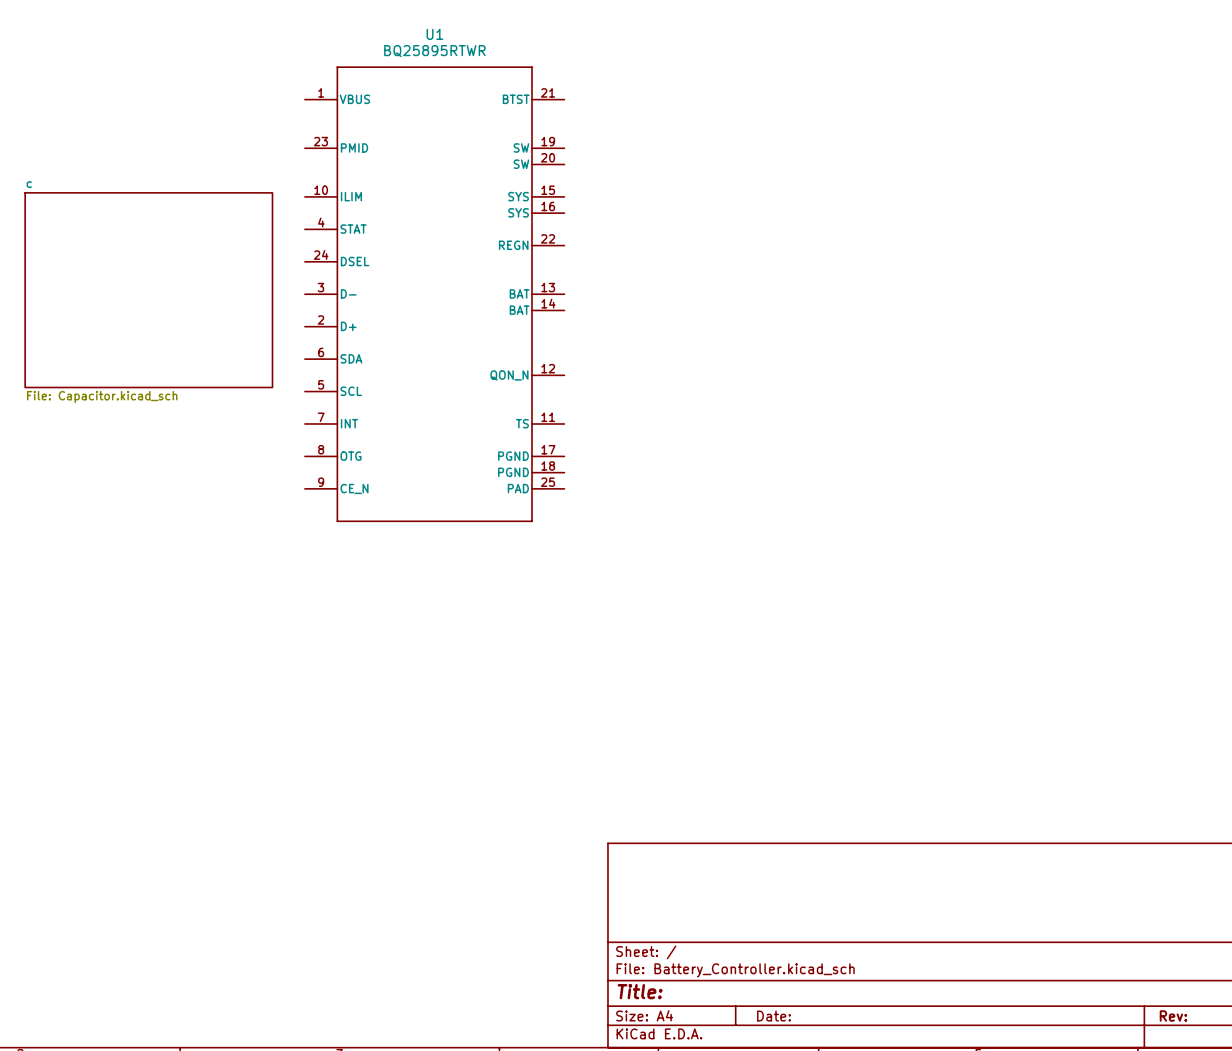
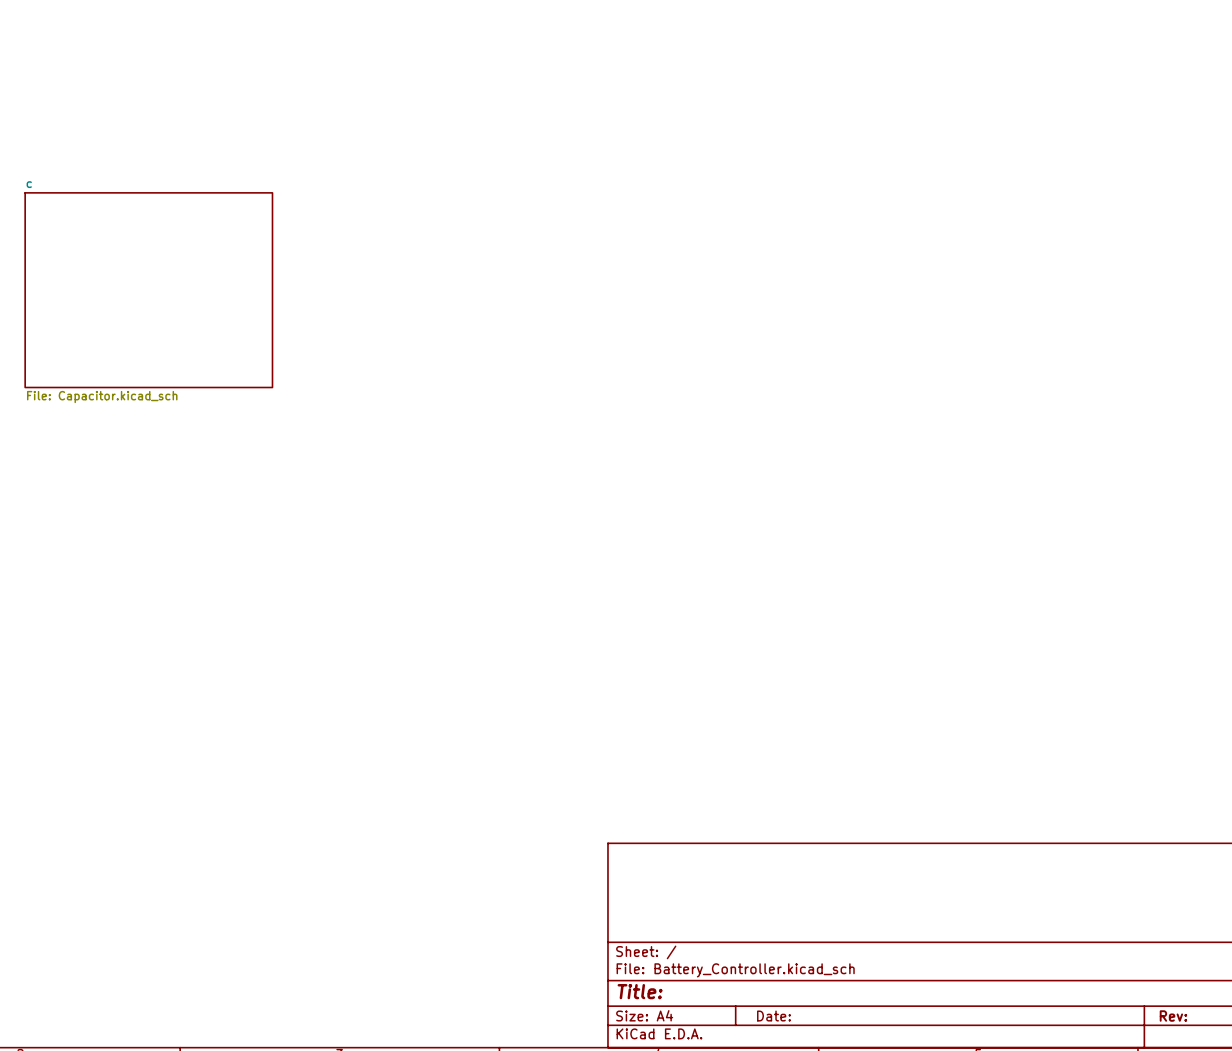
U1: BQ25895RTWR (434, 294) -> none

